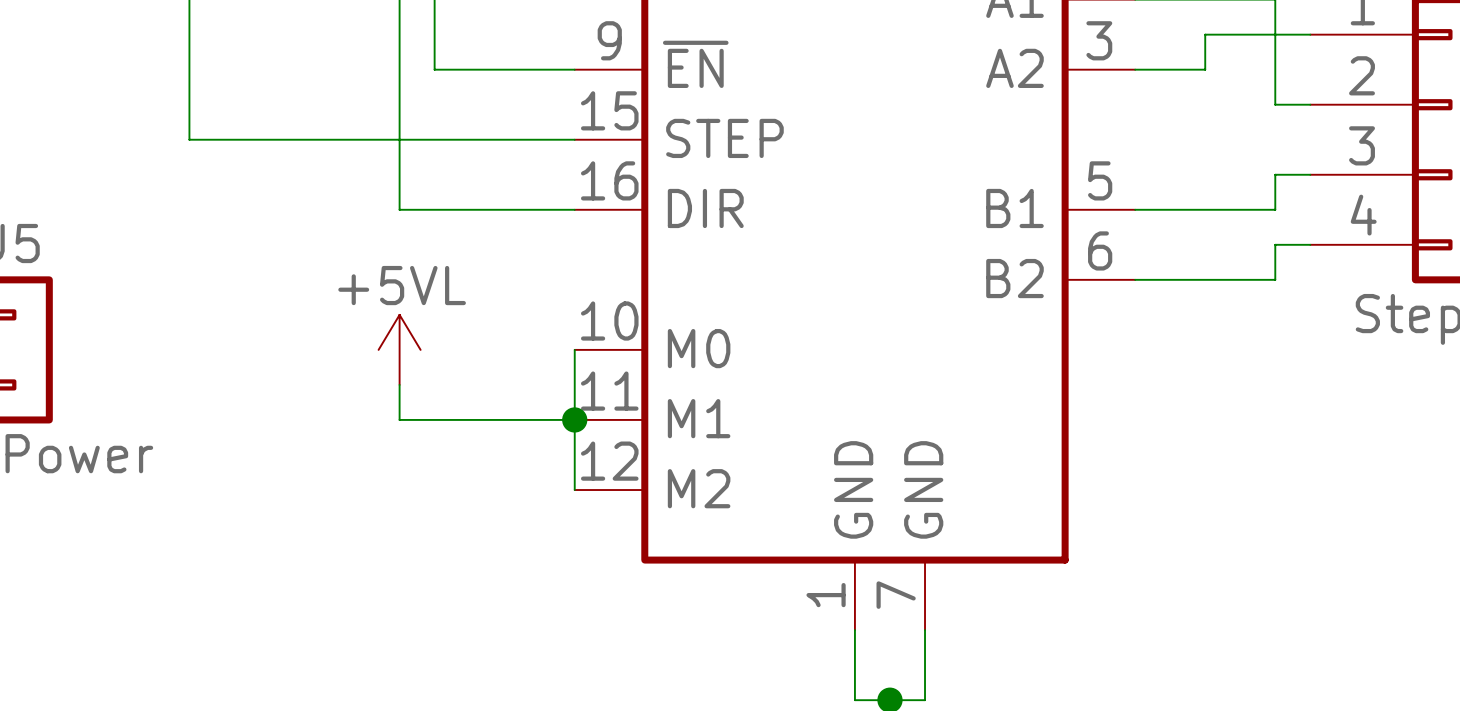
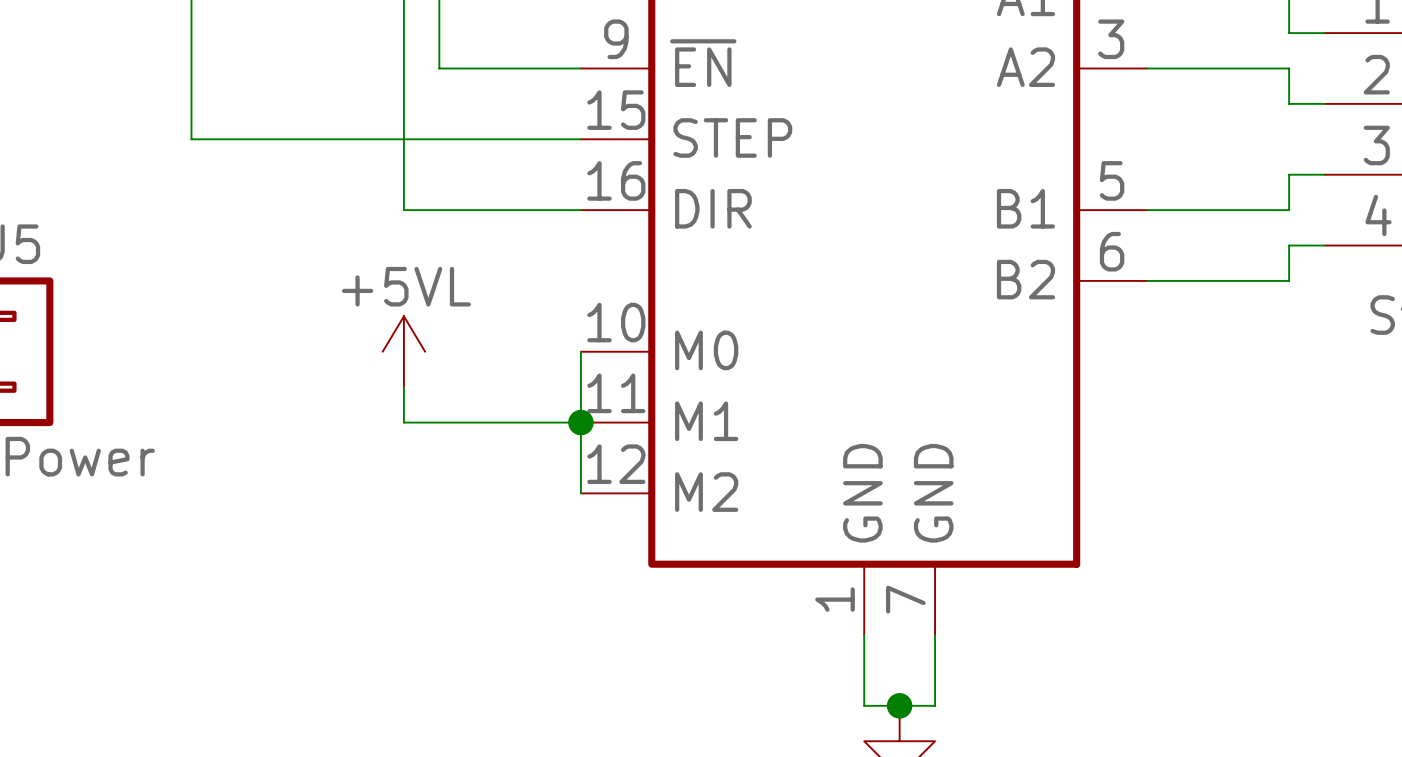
wire: (1205, 69) (1205, 34) (1275, 34) (1275, 69) -> (1218, 68) (1289, 68)

